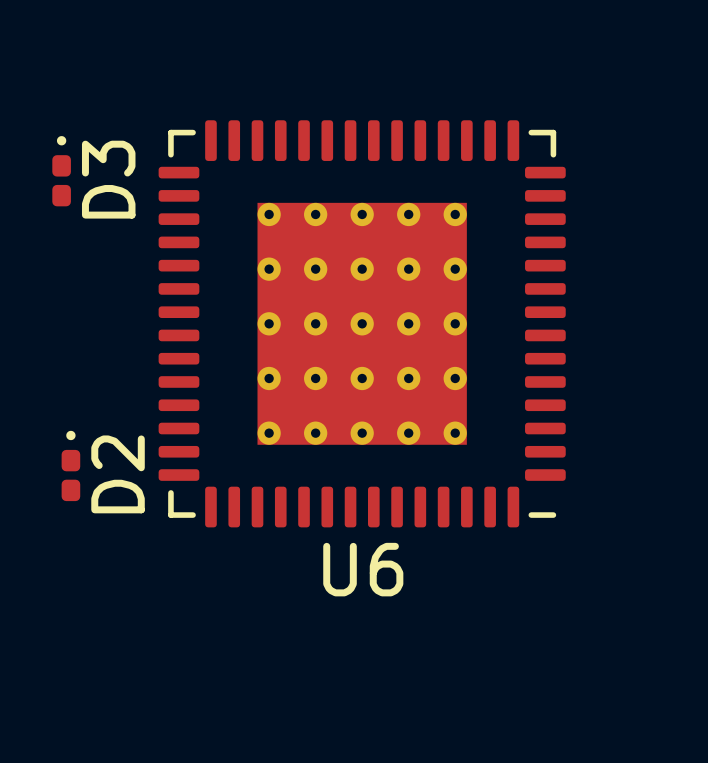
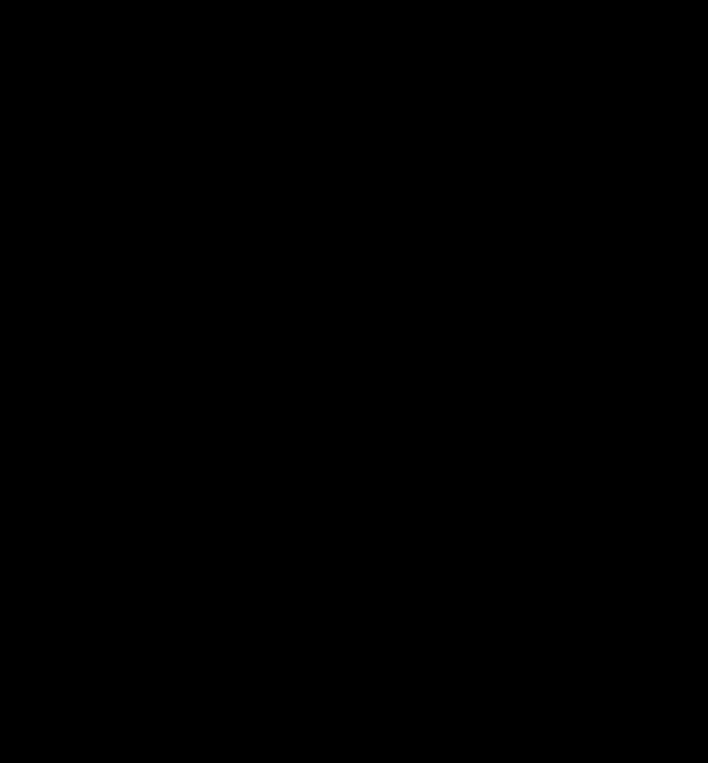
D3: (61, 171) -> none
U6: (362, 323) -> none
D2: (70, 465) -> none

